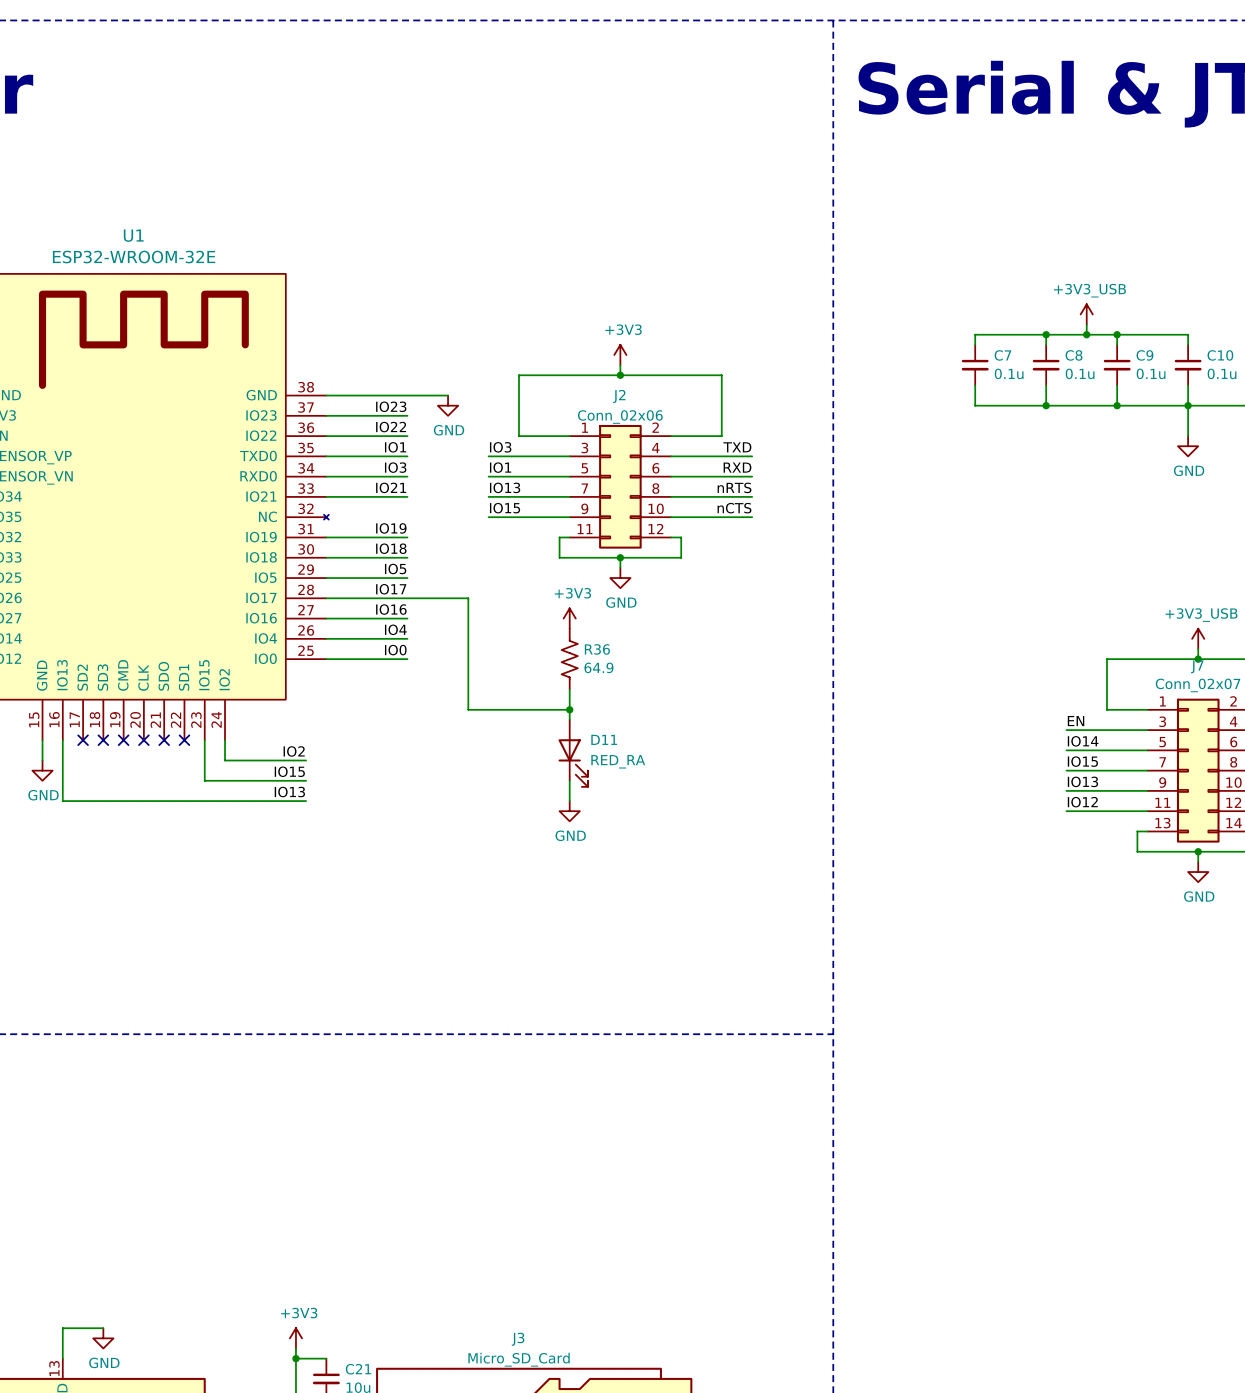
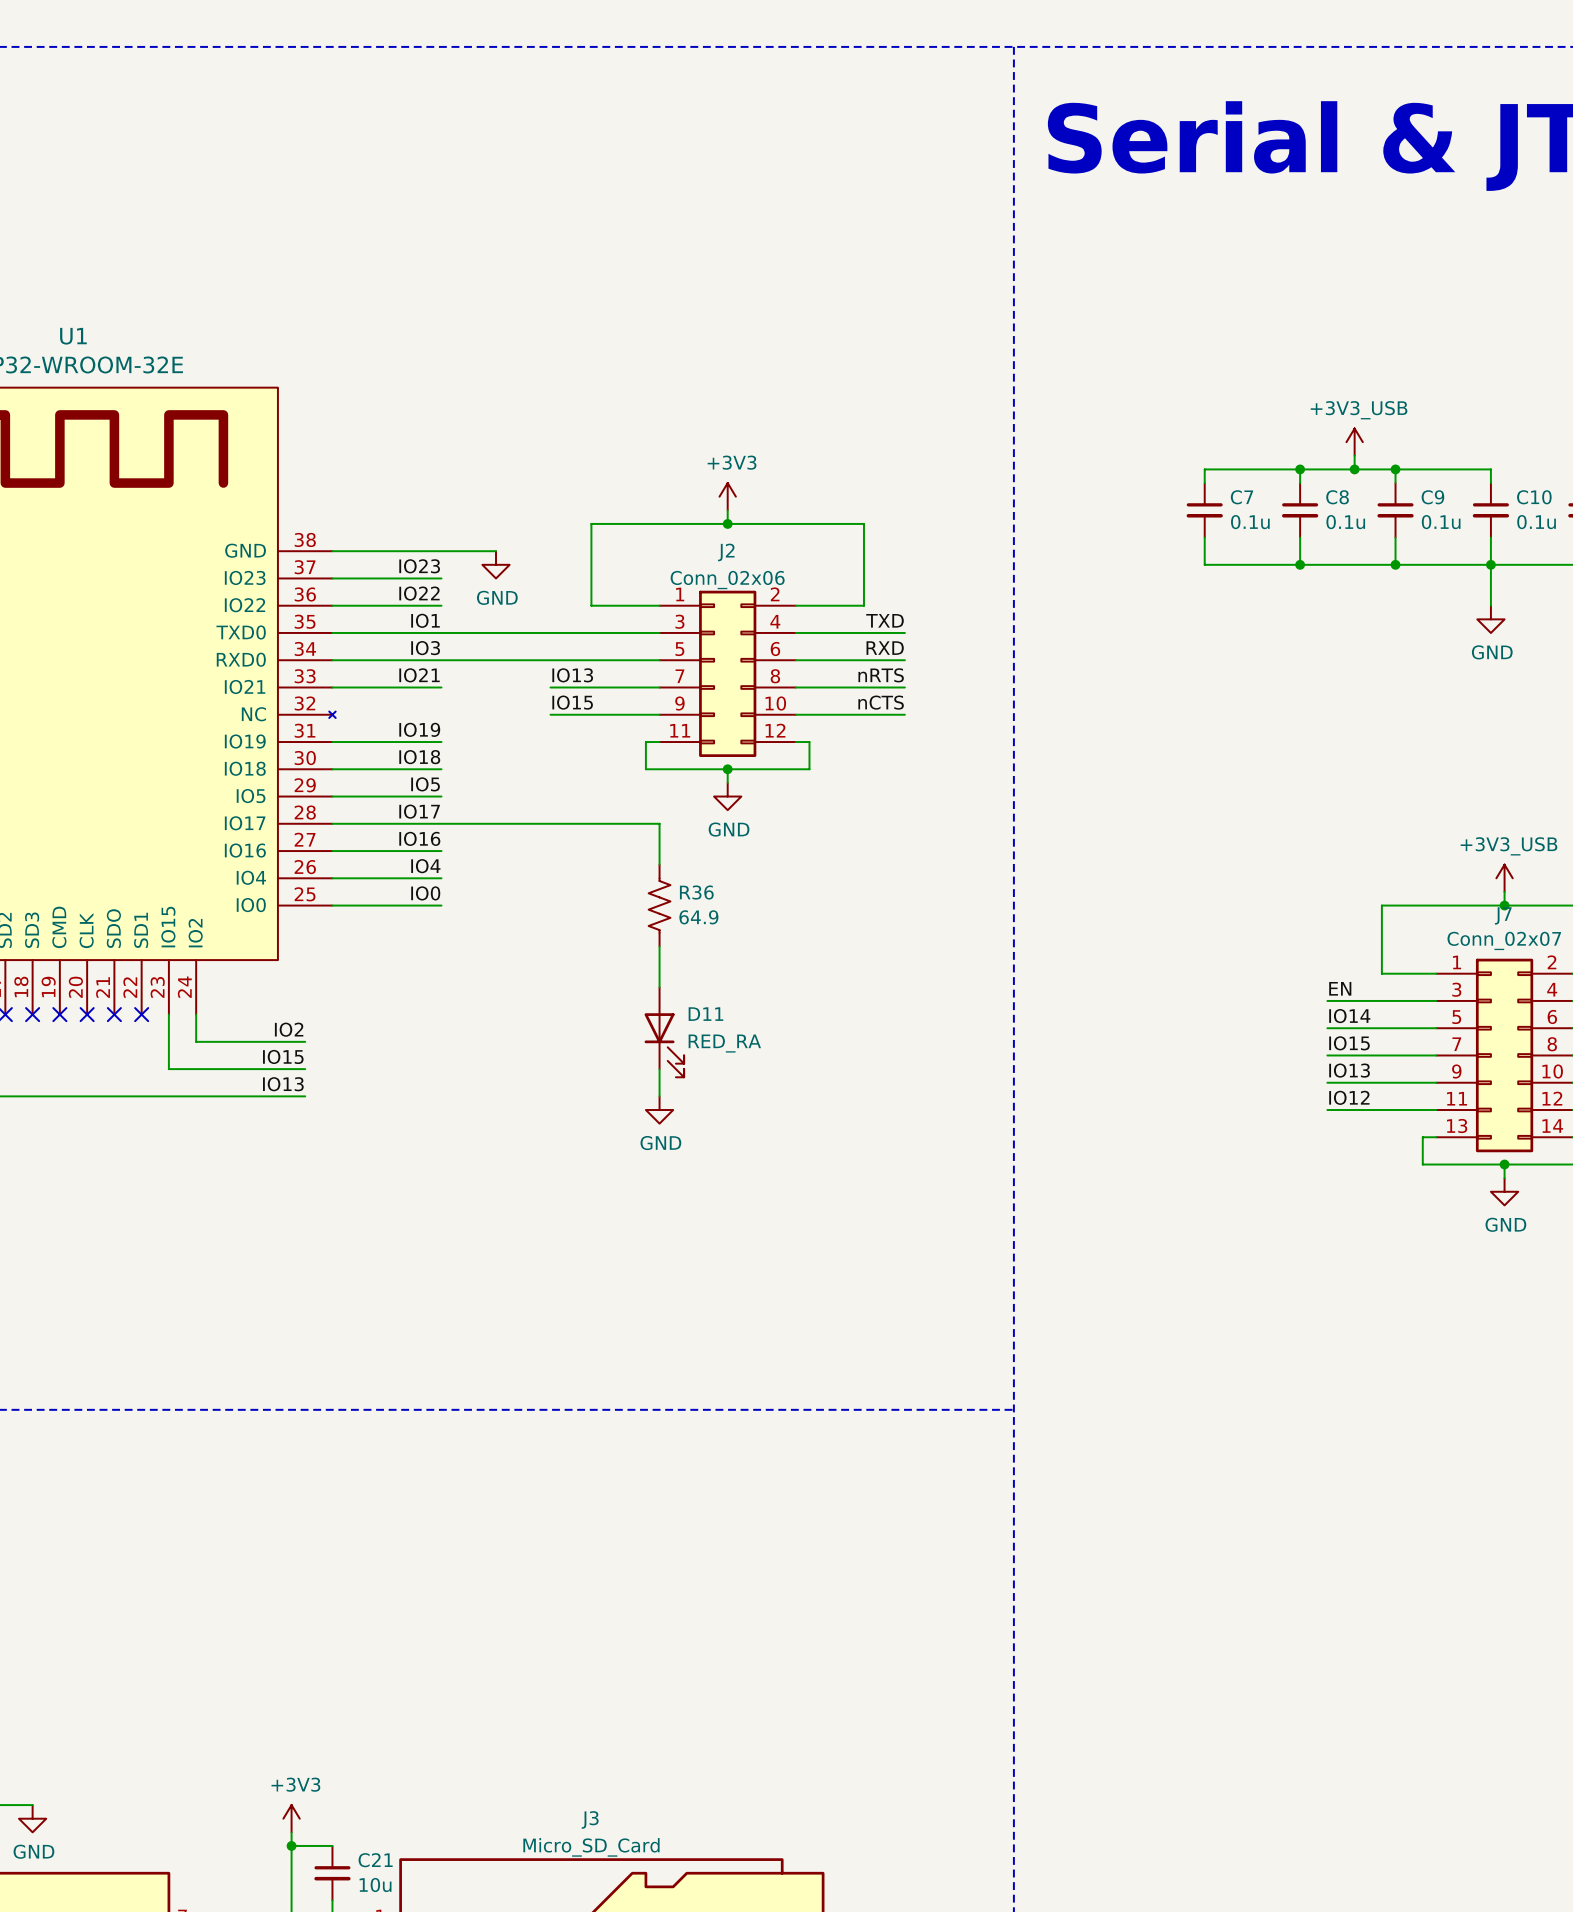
label: IO3 (500, 447) -> none
wire: none -> (441, 632) (550, 632)
label: IO1 (500, 467) -> none
wire: none -> (441, 660) (550, 660)
wire: (468, 598) (468, 709) (569, 709) -> (523, 823) (659, 823) (659, 864)
power symbol: +3V3 (569, 618) -> none
junction: (569, 709) -> none

